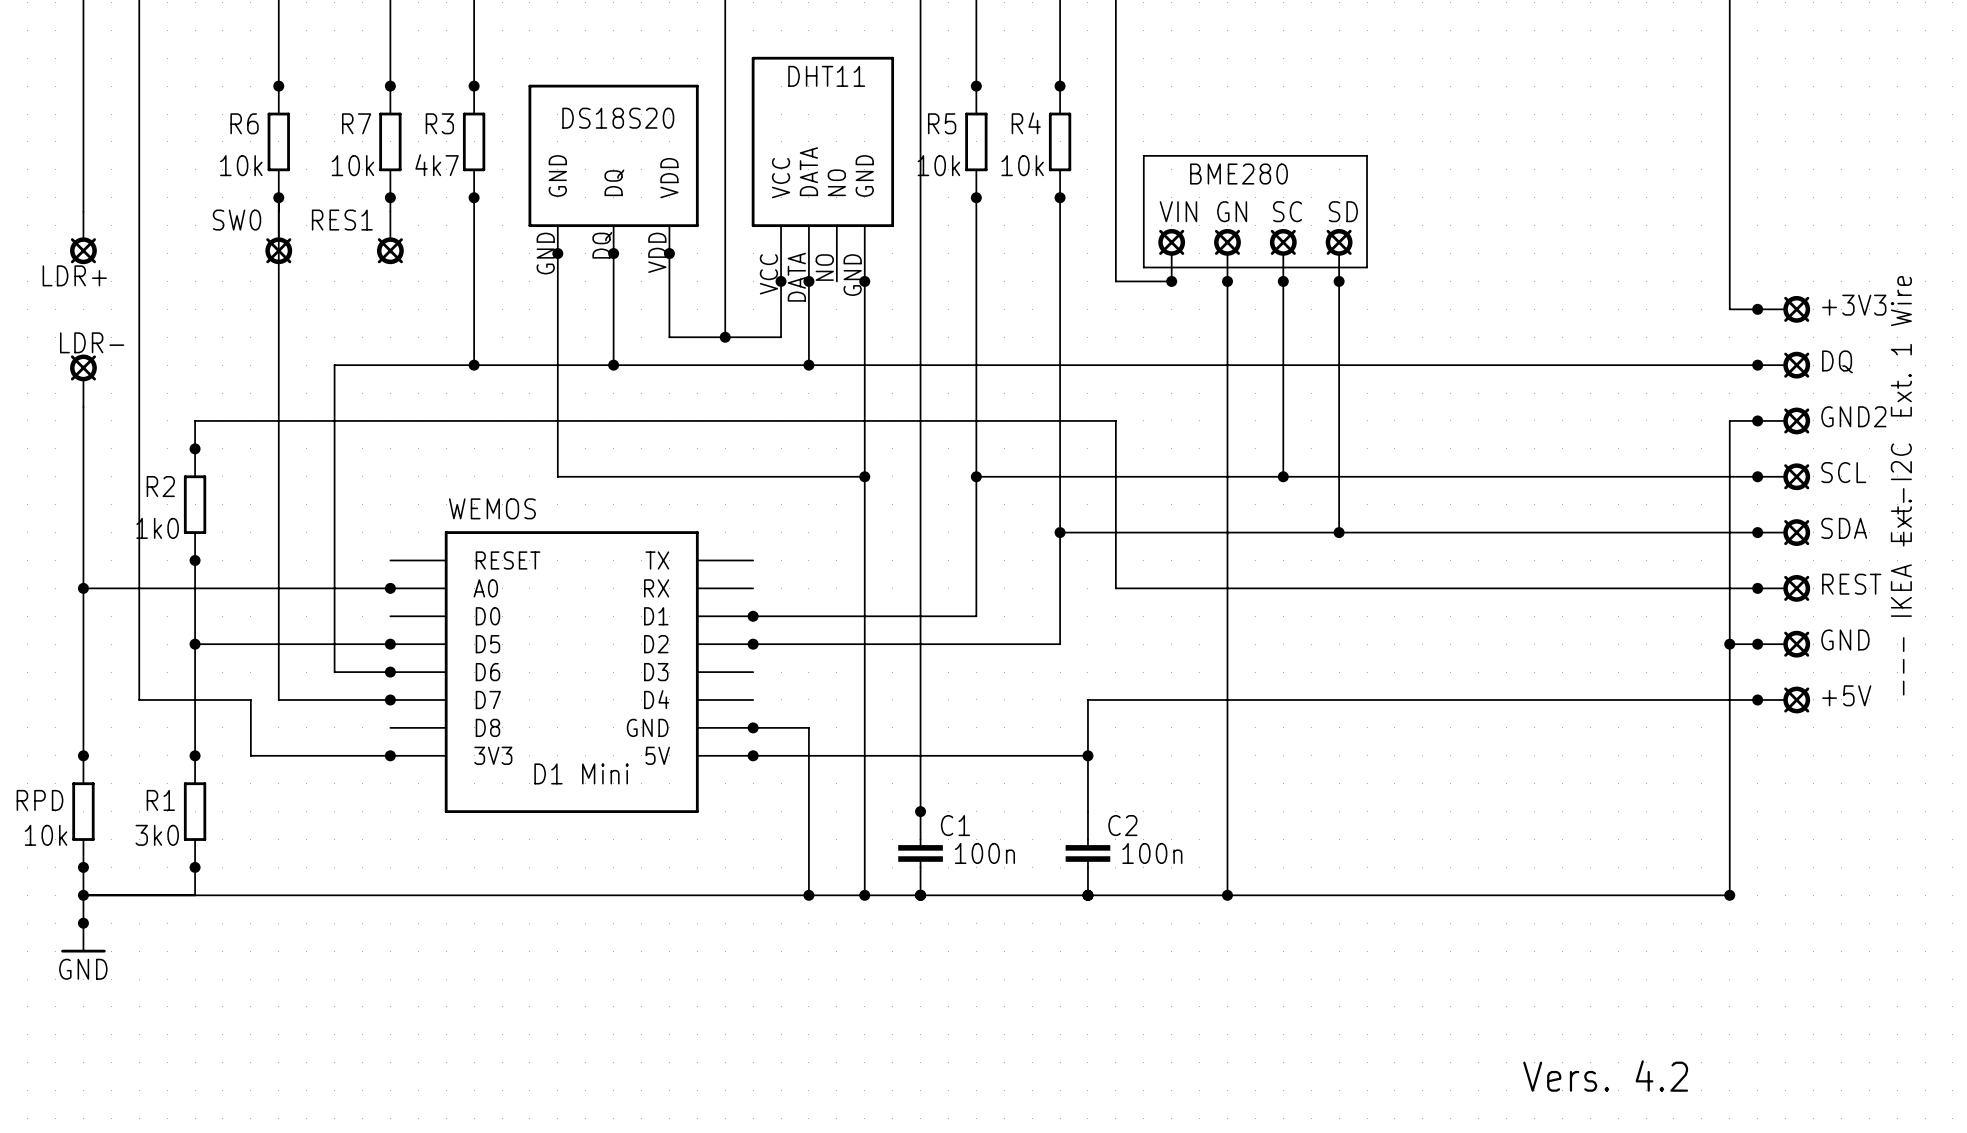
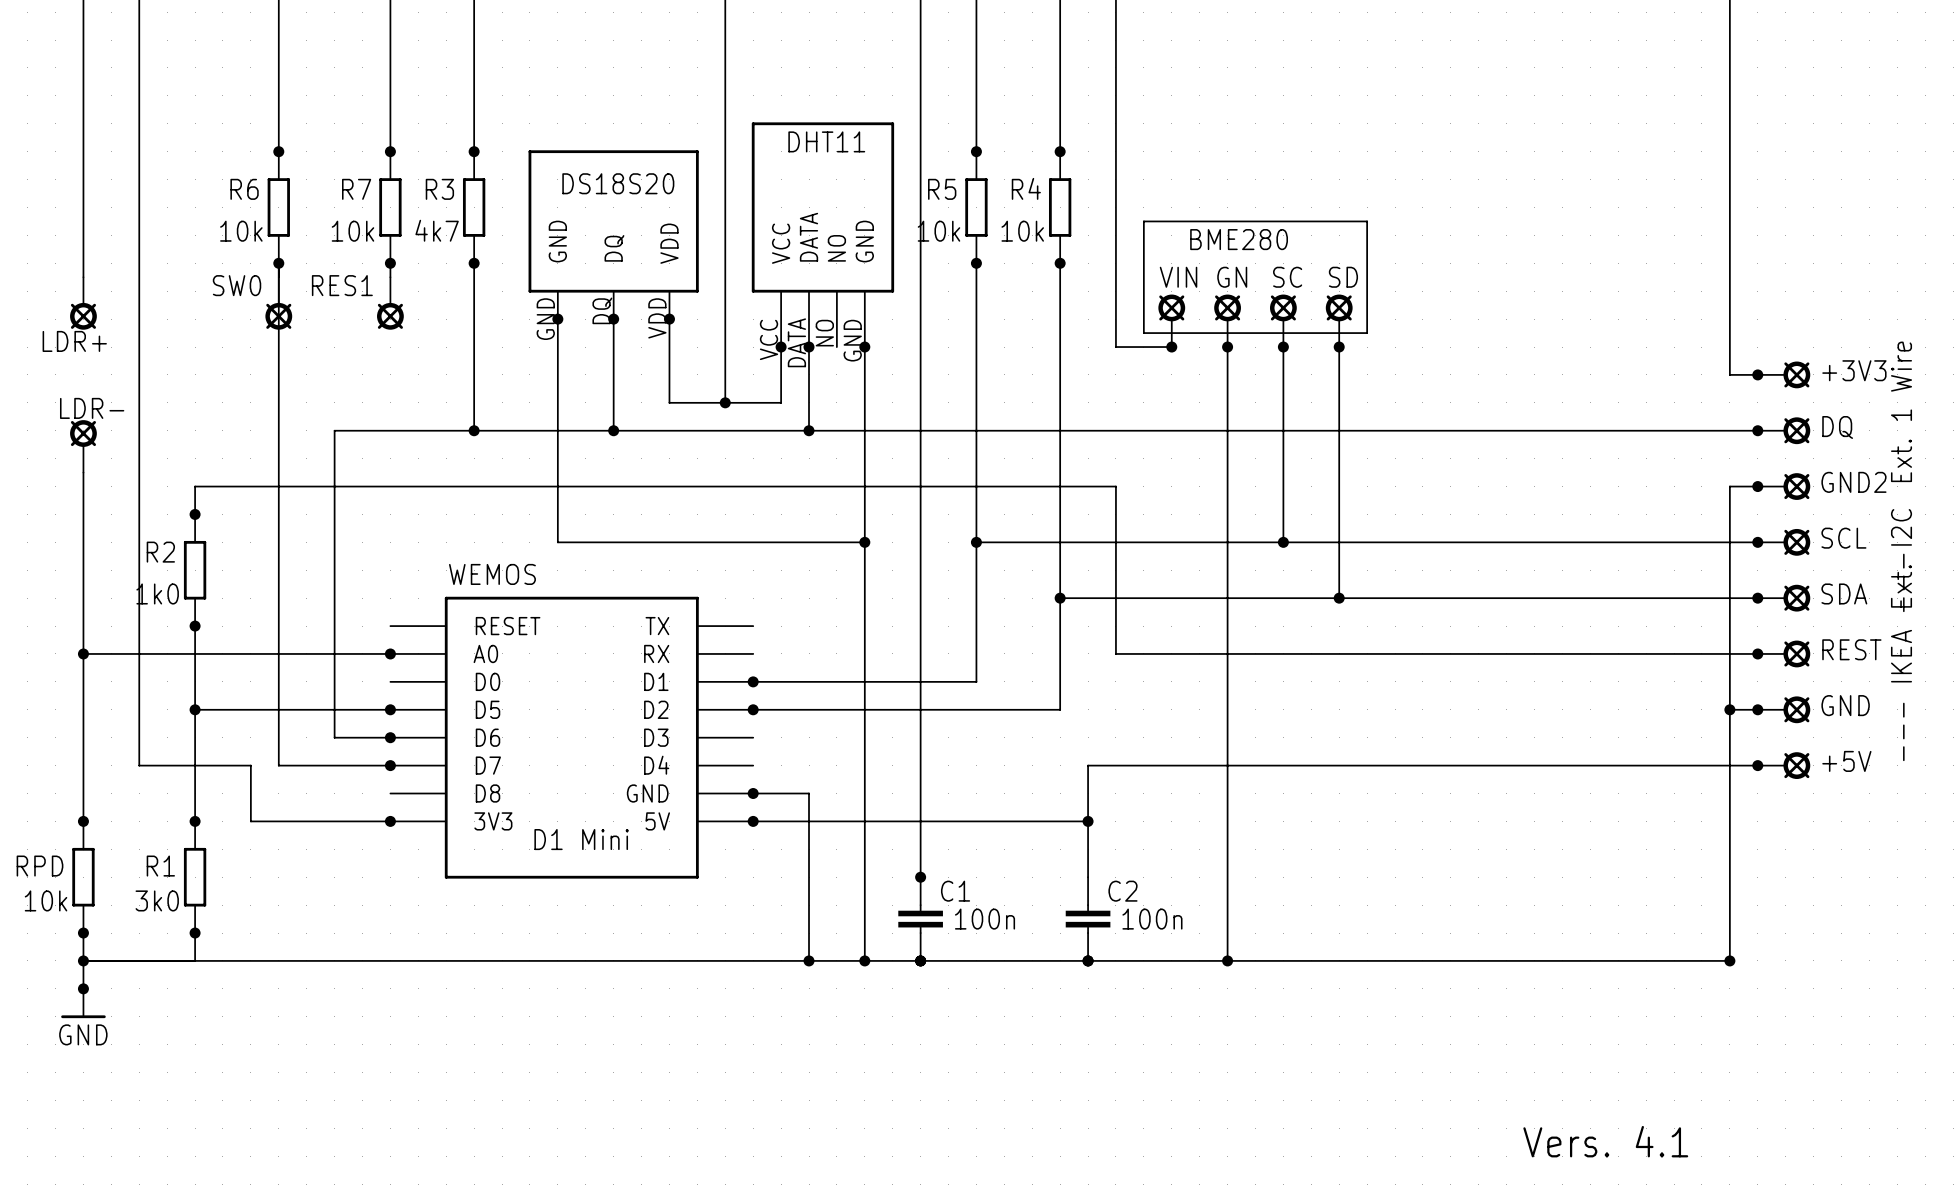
text: Vers. 4.2 (1605, 1076) -> Vers. 4.1 (1605, 1141)

